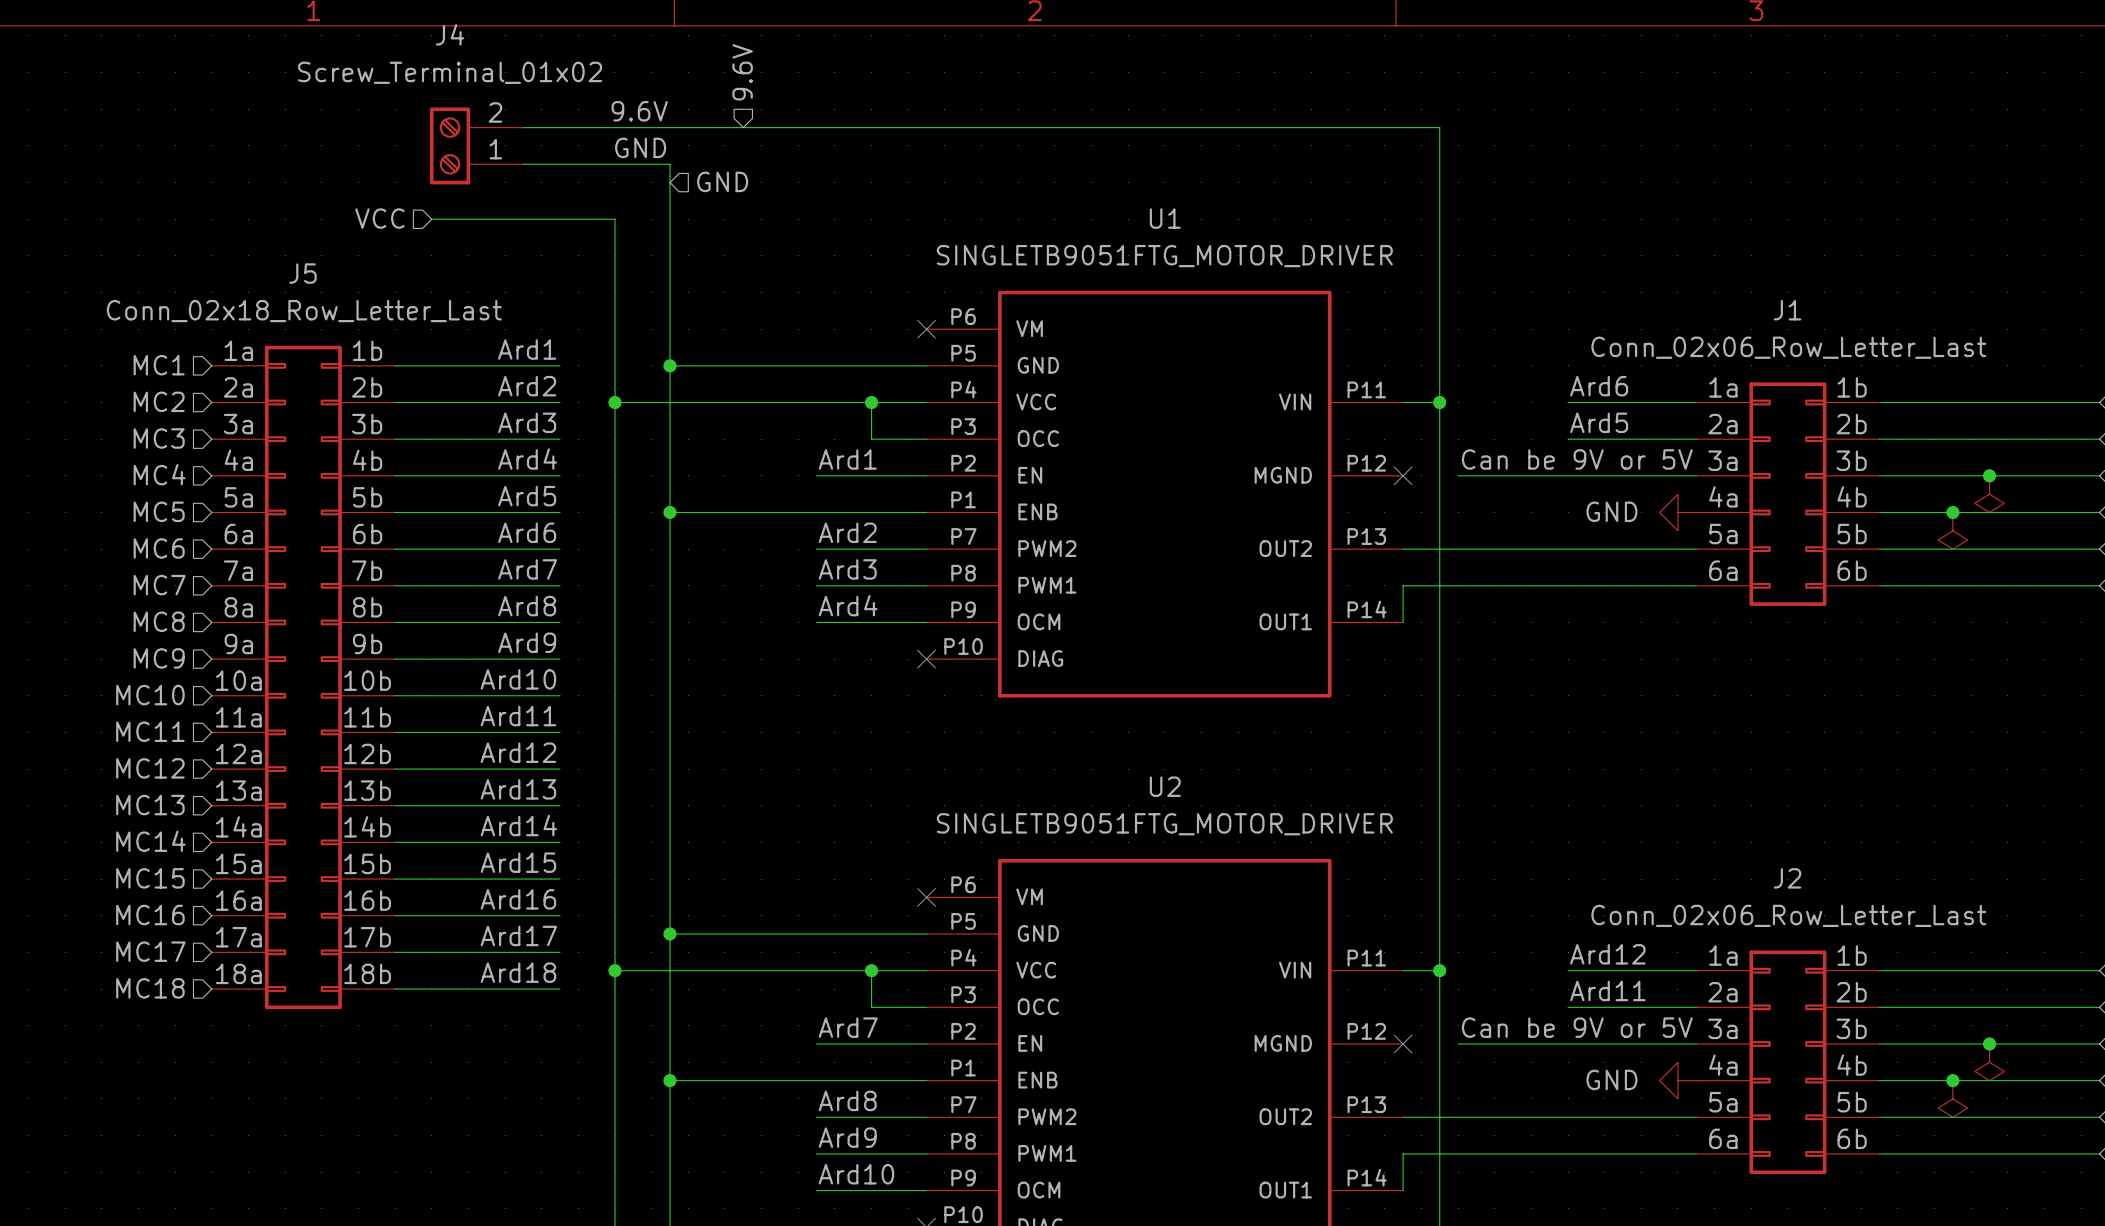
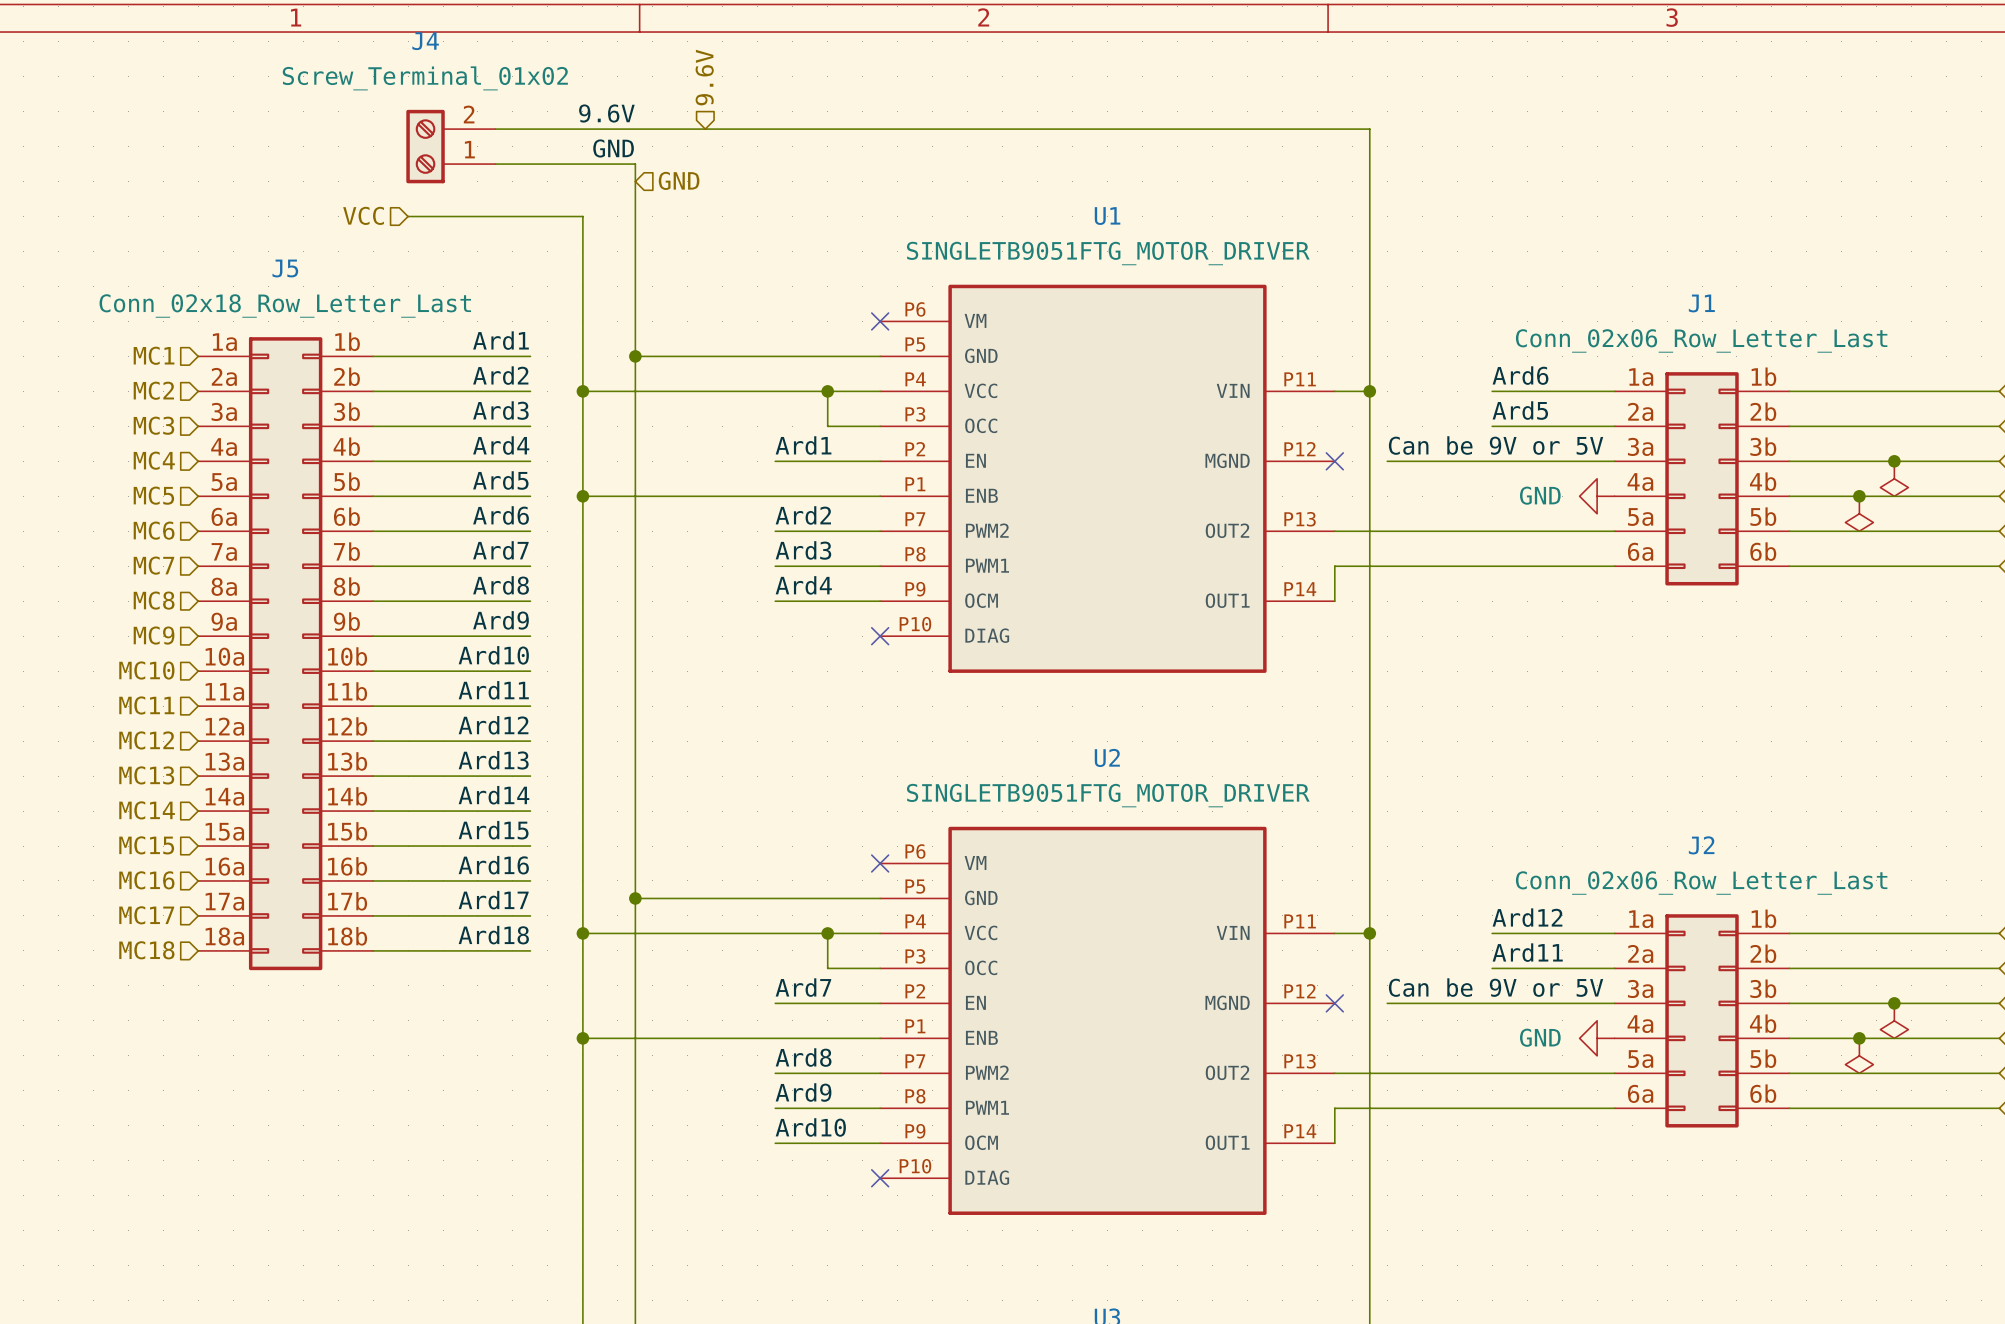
wire: none -> (582, 496) (635, 496)
junction position: (669, 512) -> (582, 496)
wire: none -> (582, 1038) (635, 1038)
junction position: (669, 1080) -> (582, 1038)

